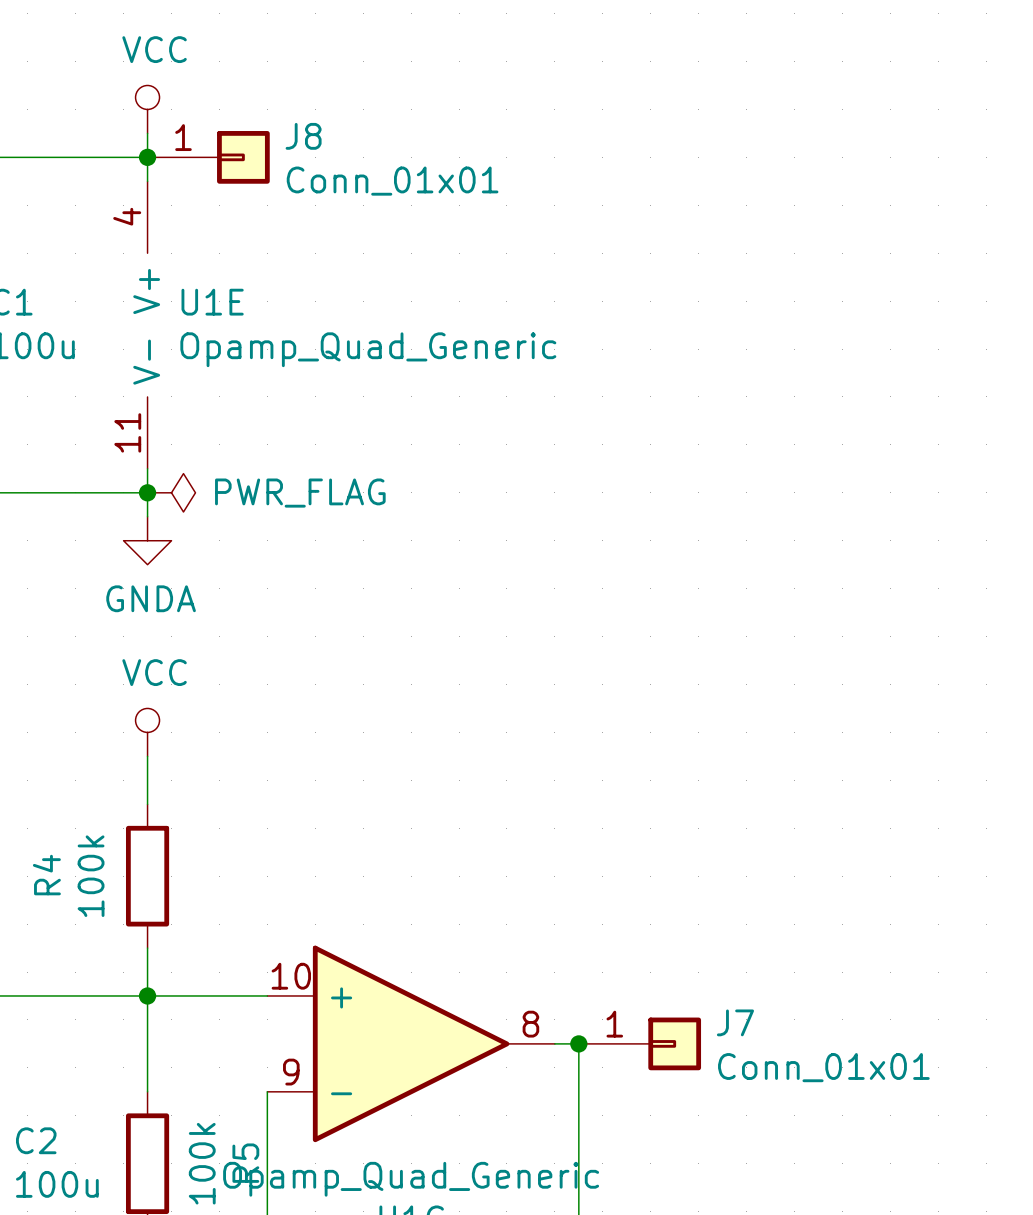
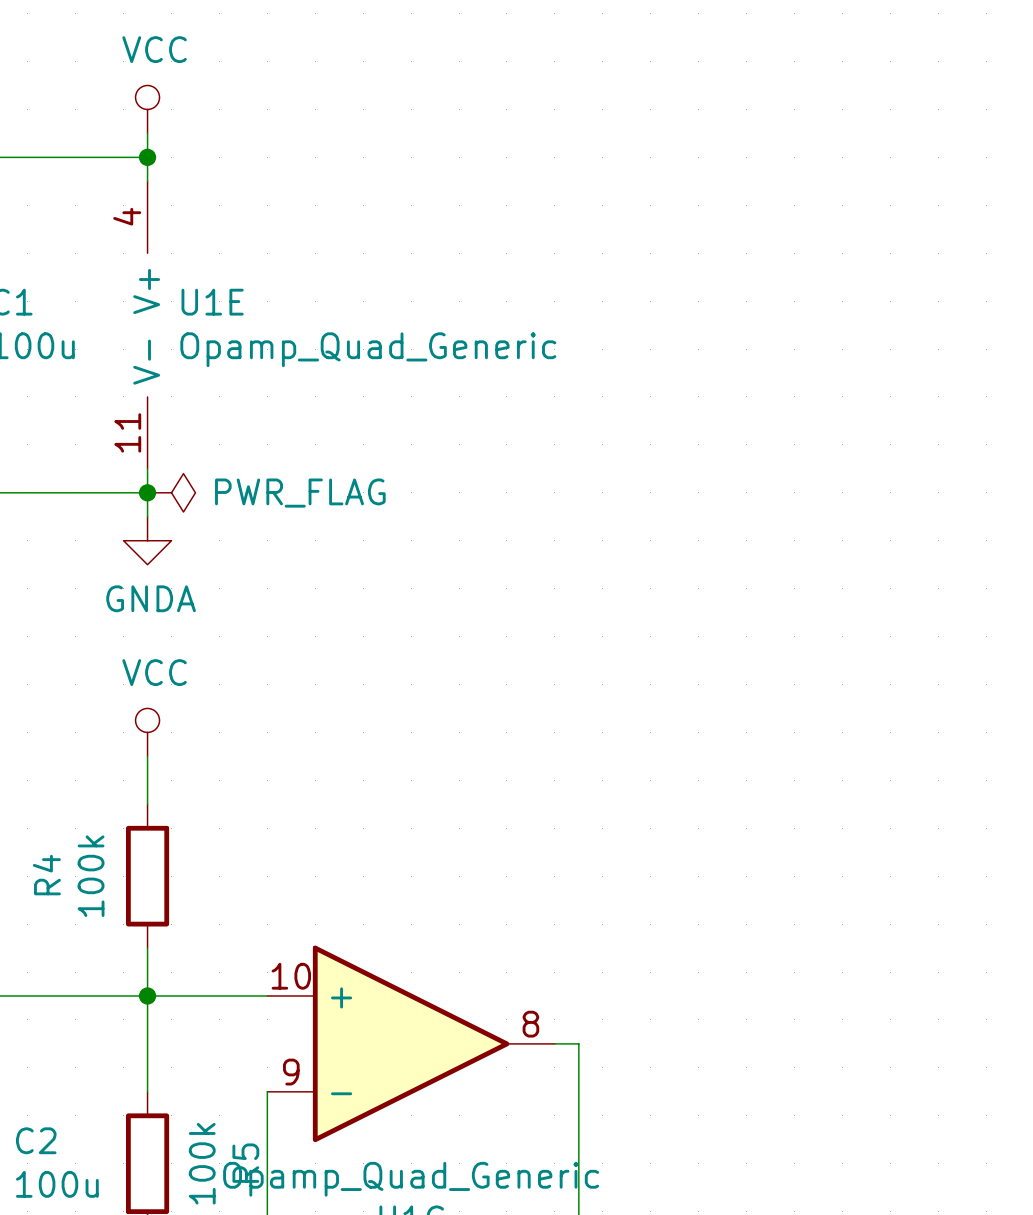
J8: Conn_01x01 (208, 157) -> none
junction: (578, 1043) -> none
J7: Conn_01x01 (639, 1043) -> none

